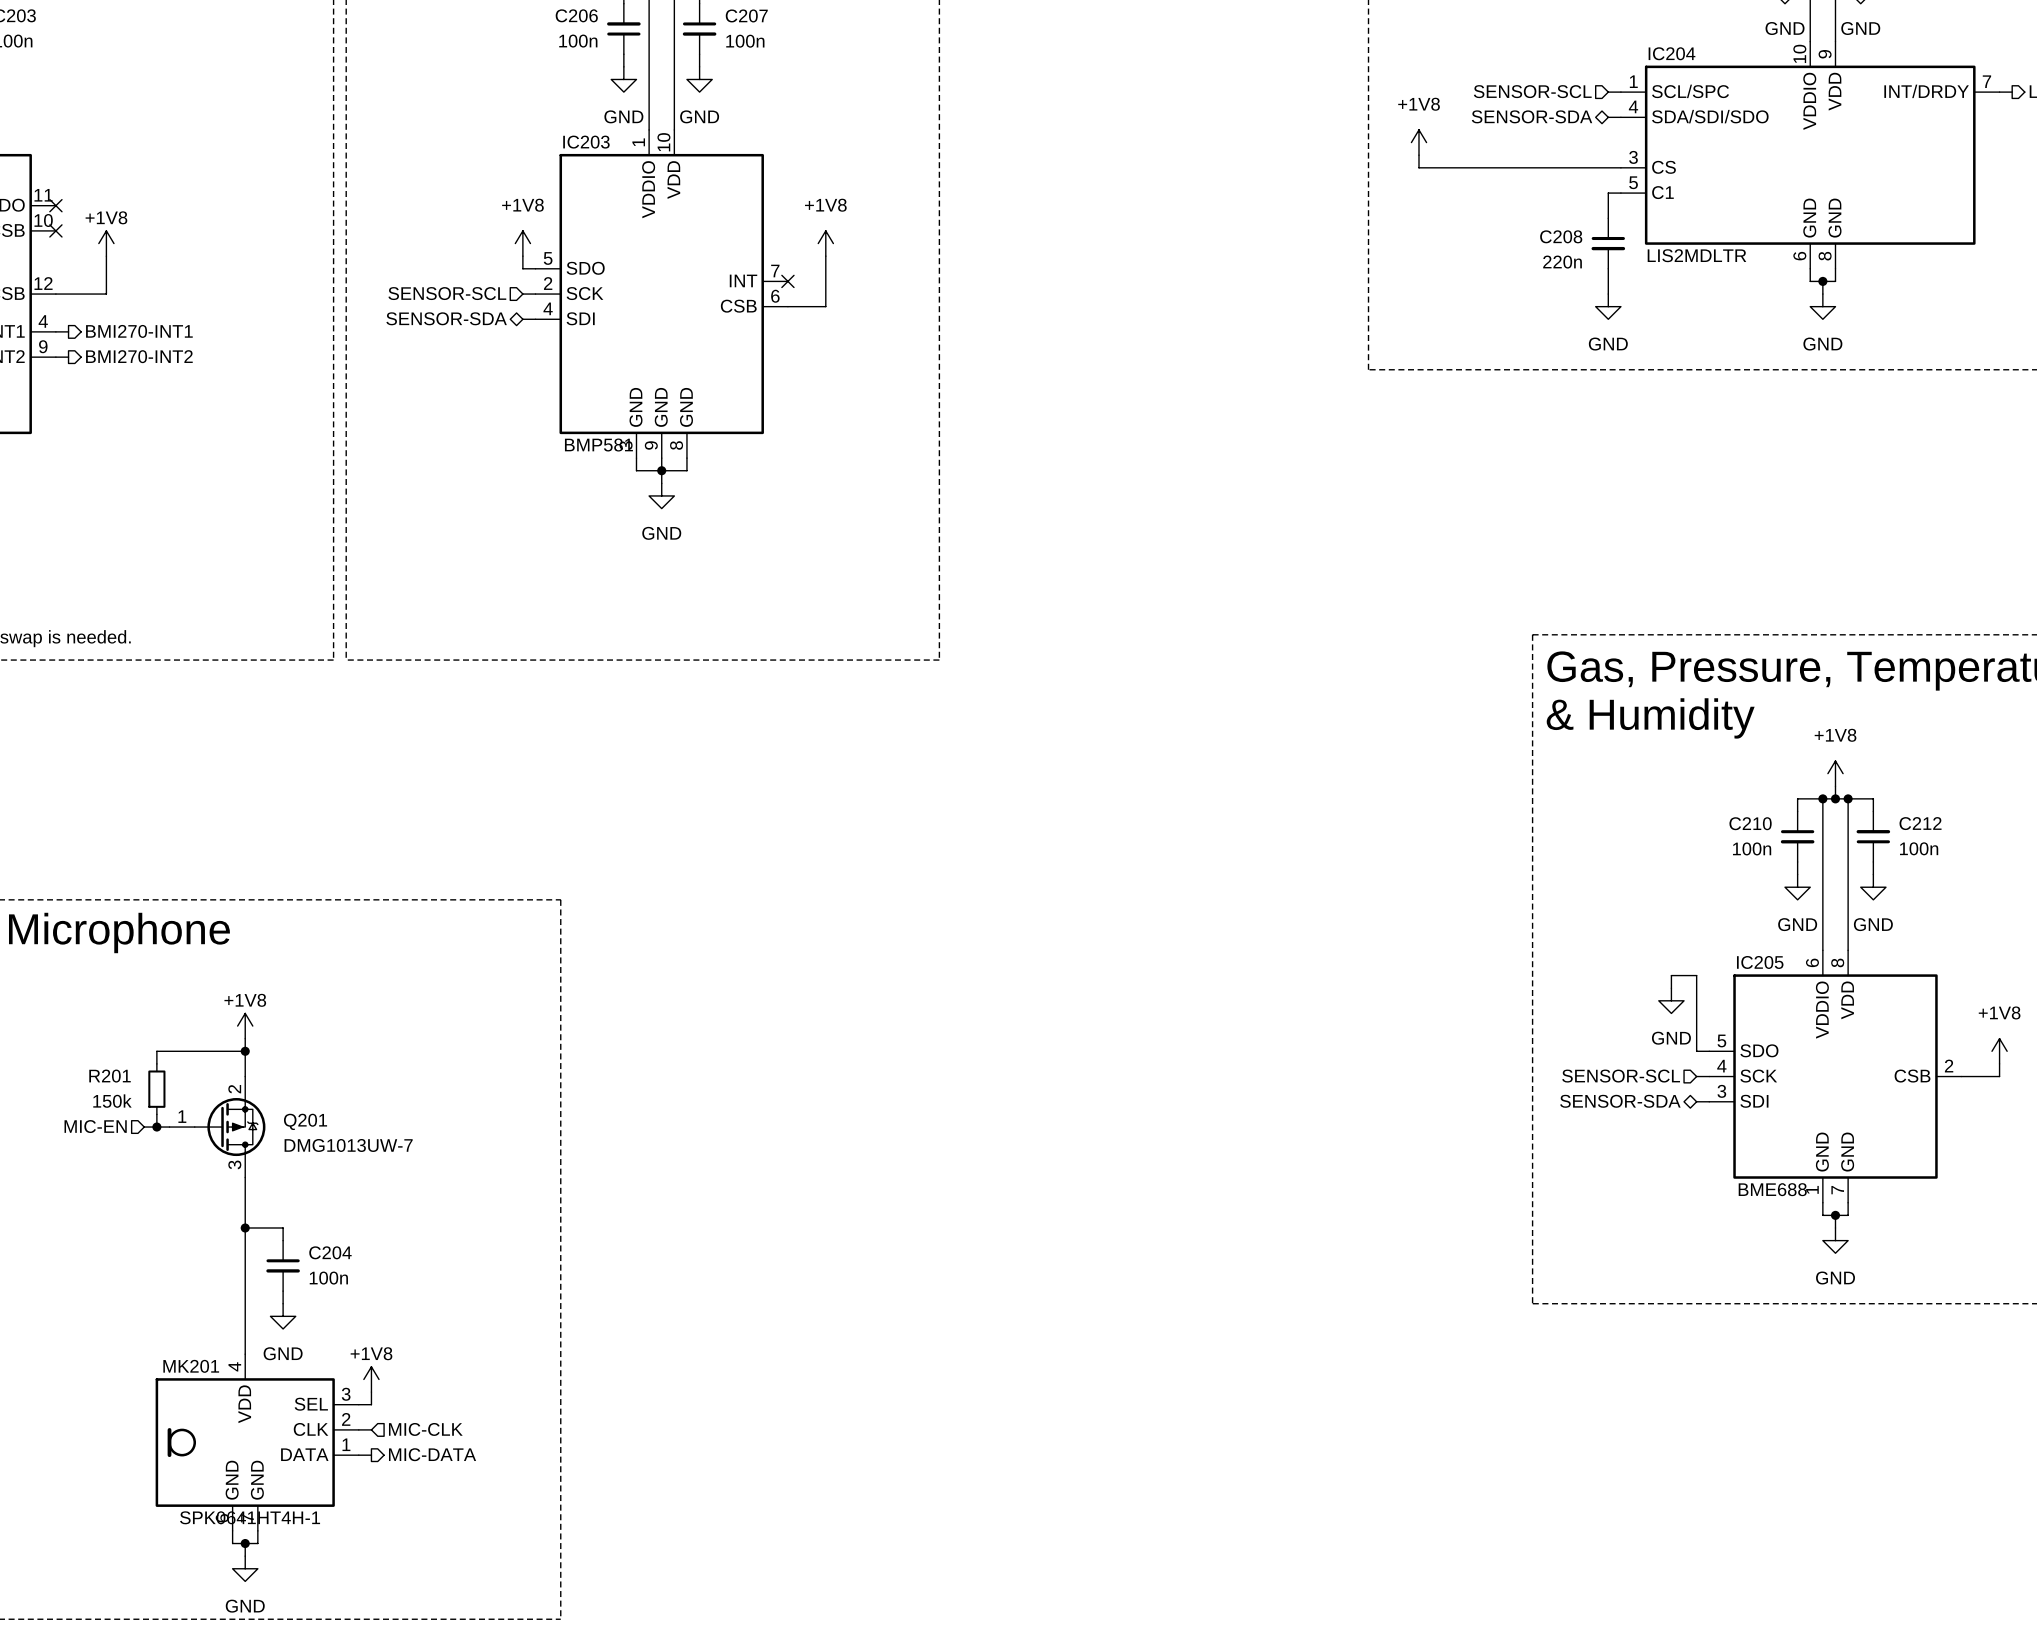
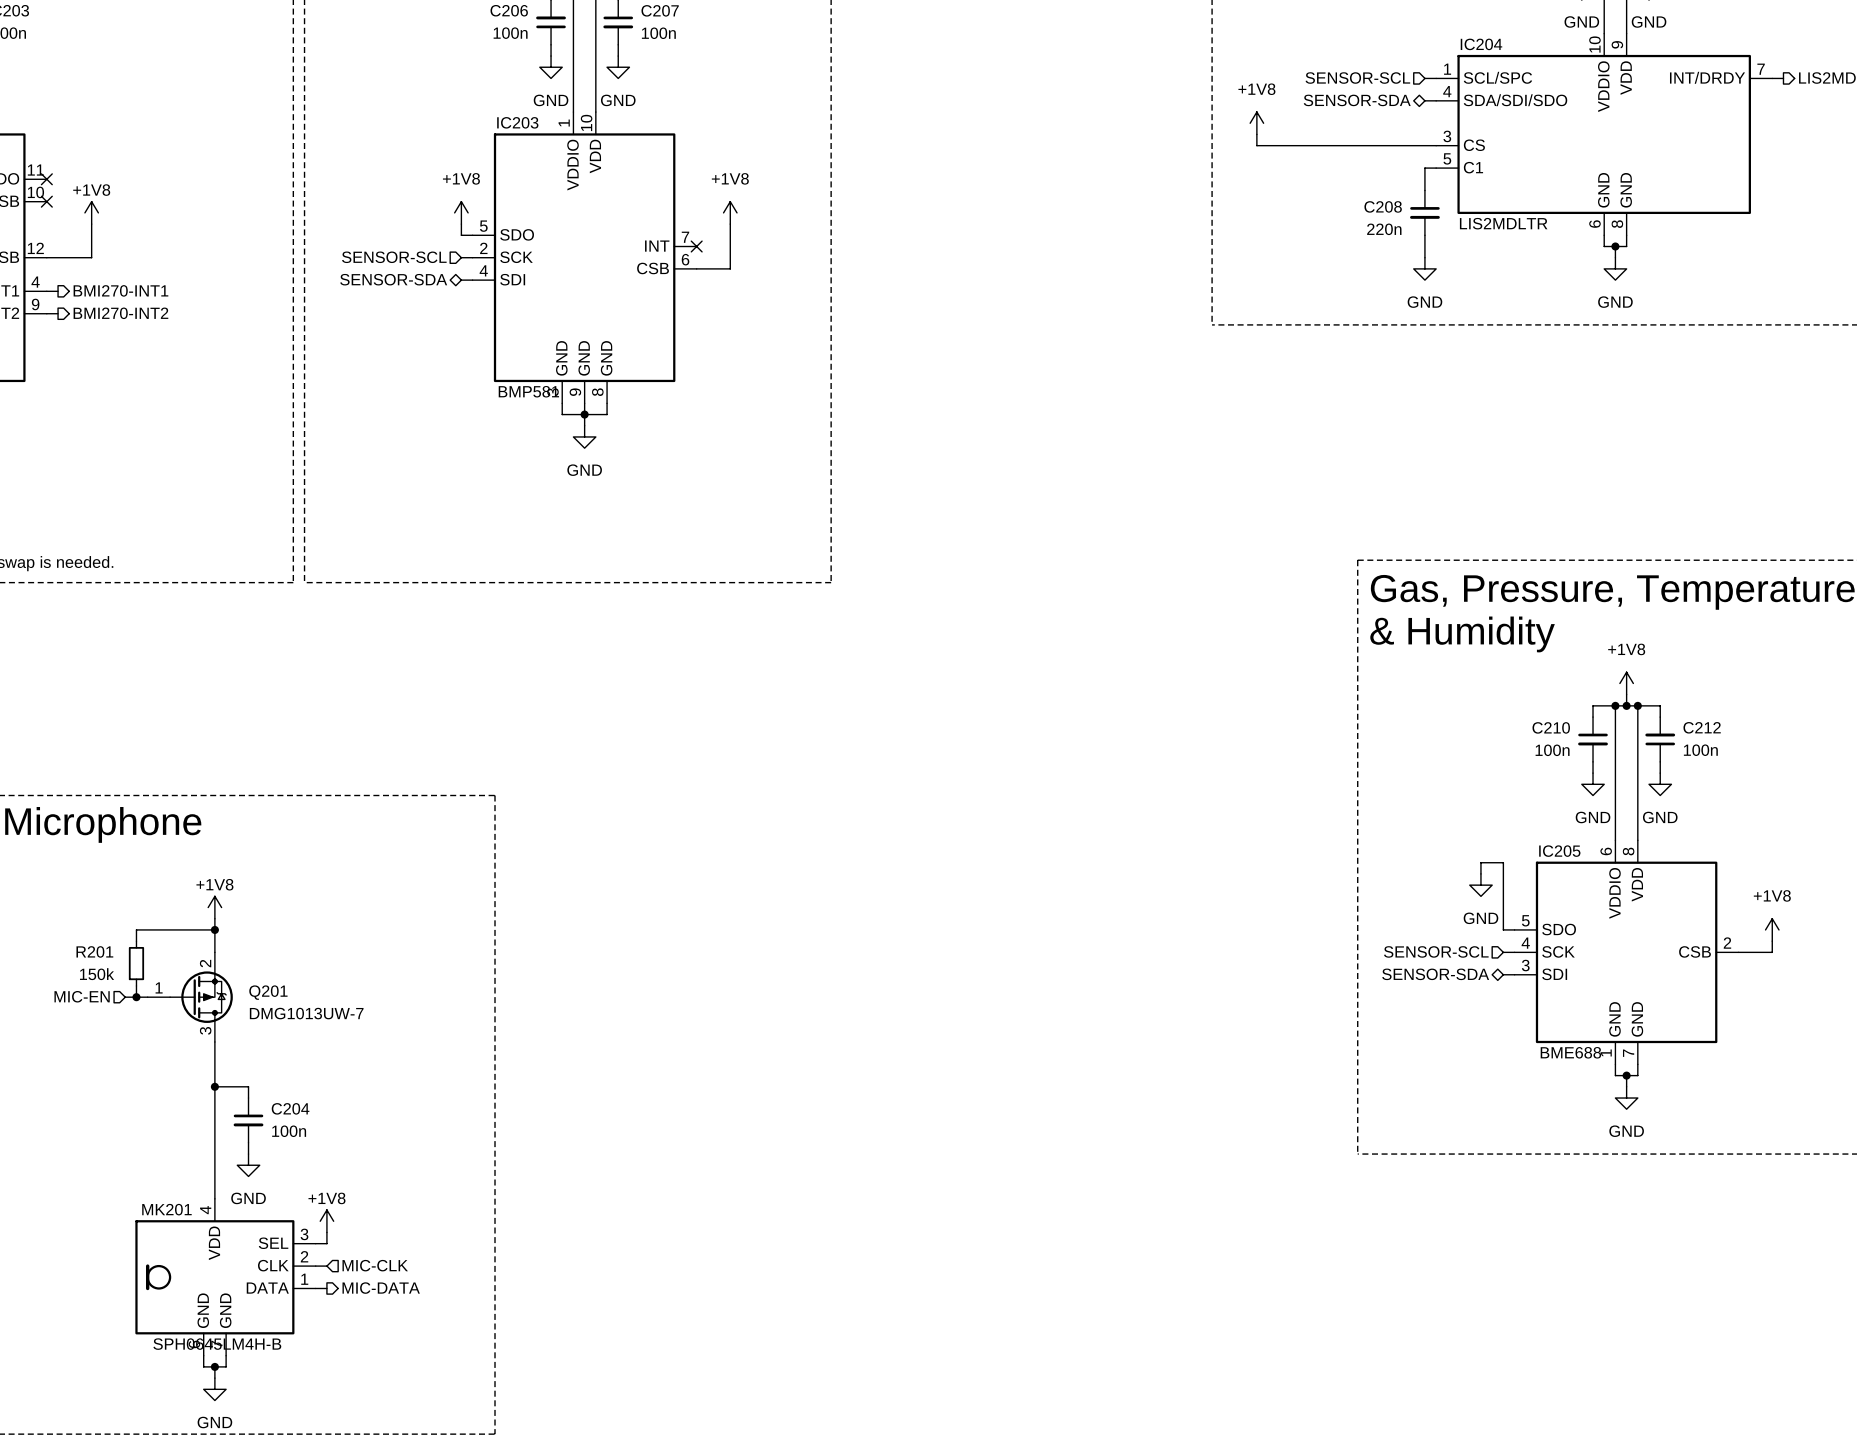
MK201 value: SPK0641HT4H-1 (250, 1517) -> SPH0645LM4H-B (217, 1344)

